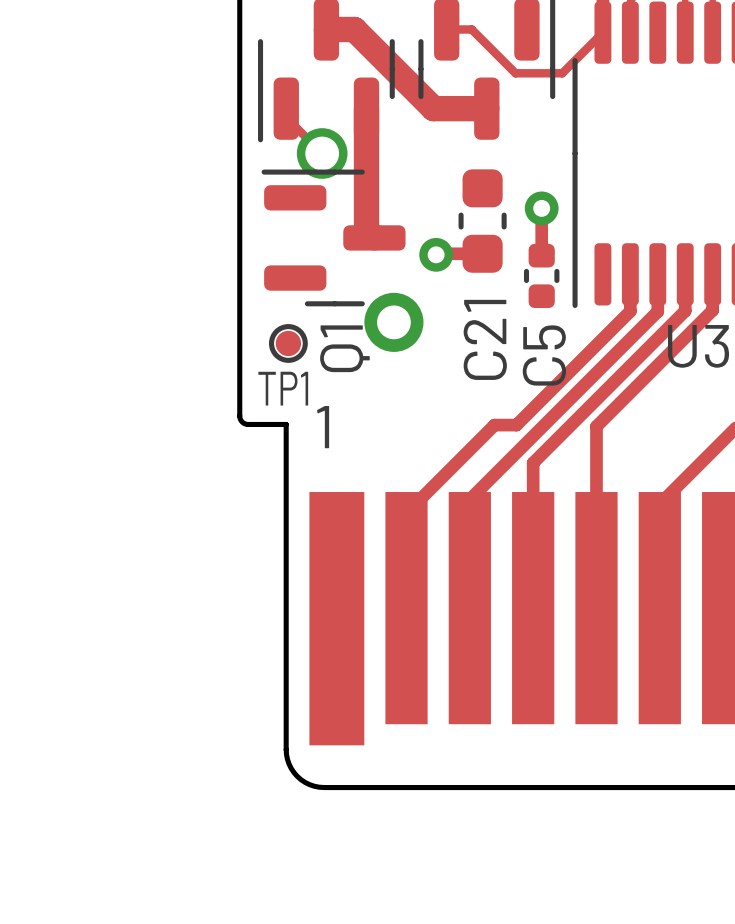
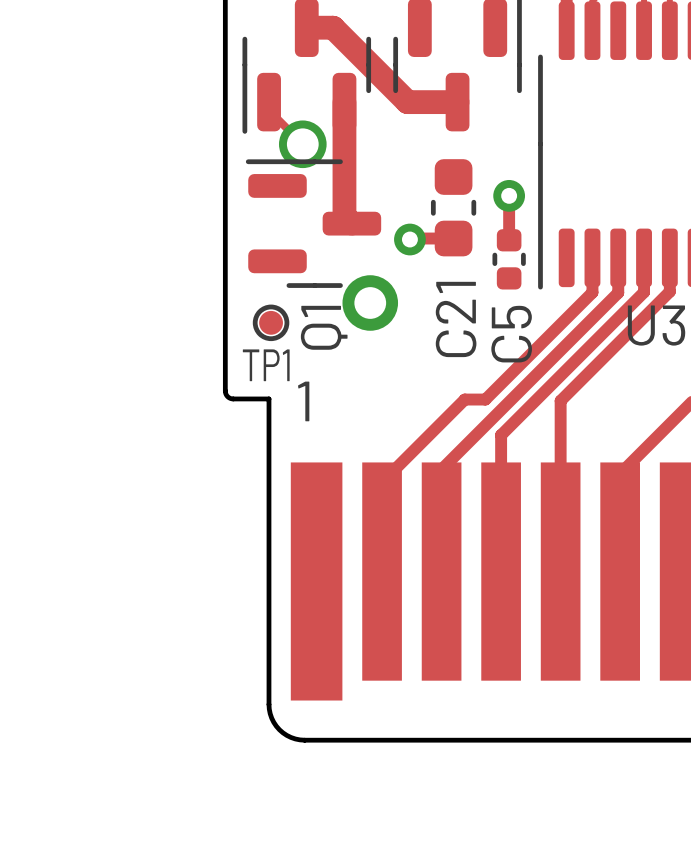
track: (446, 29) (471, 29) (515, 73) (562, 73) (602, 32) -> none

